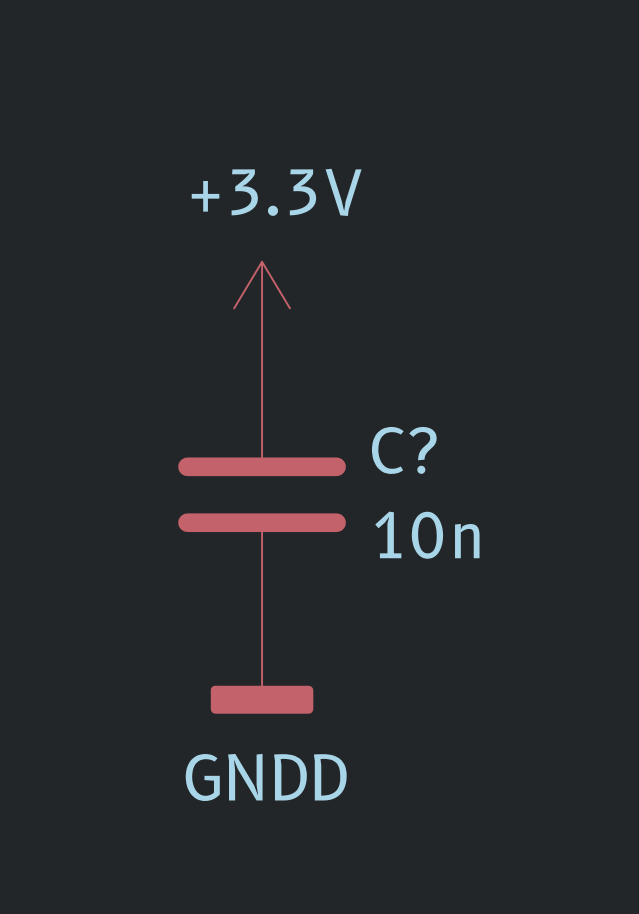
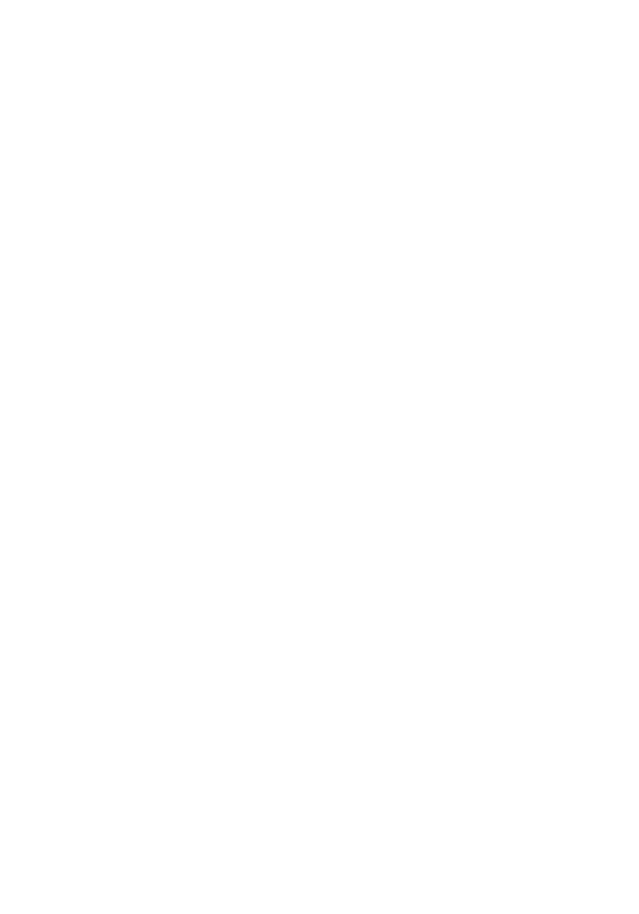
power symbol: +3.3V (262, 308) -> none
C?: 10n (262, 494) -> none
power symbol: GNDD (262, 674) -> none

